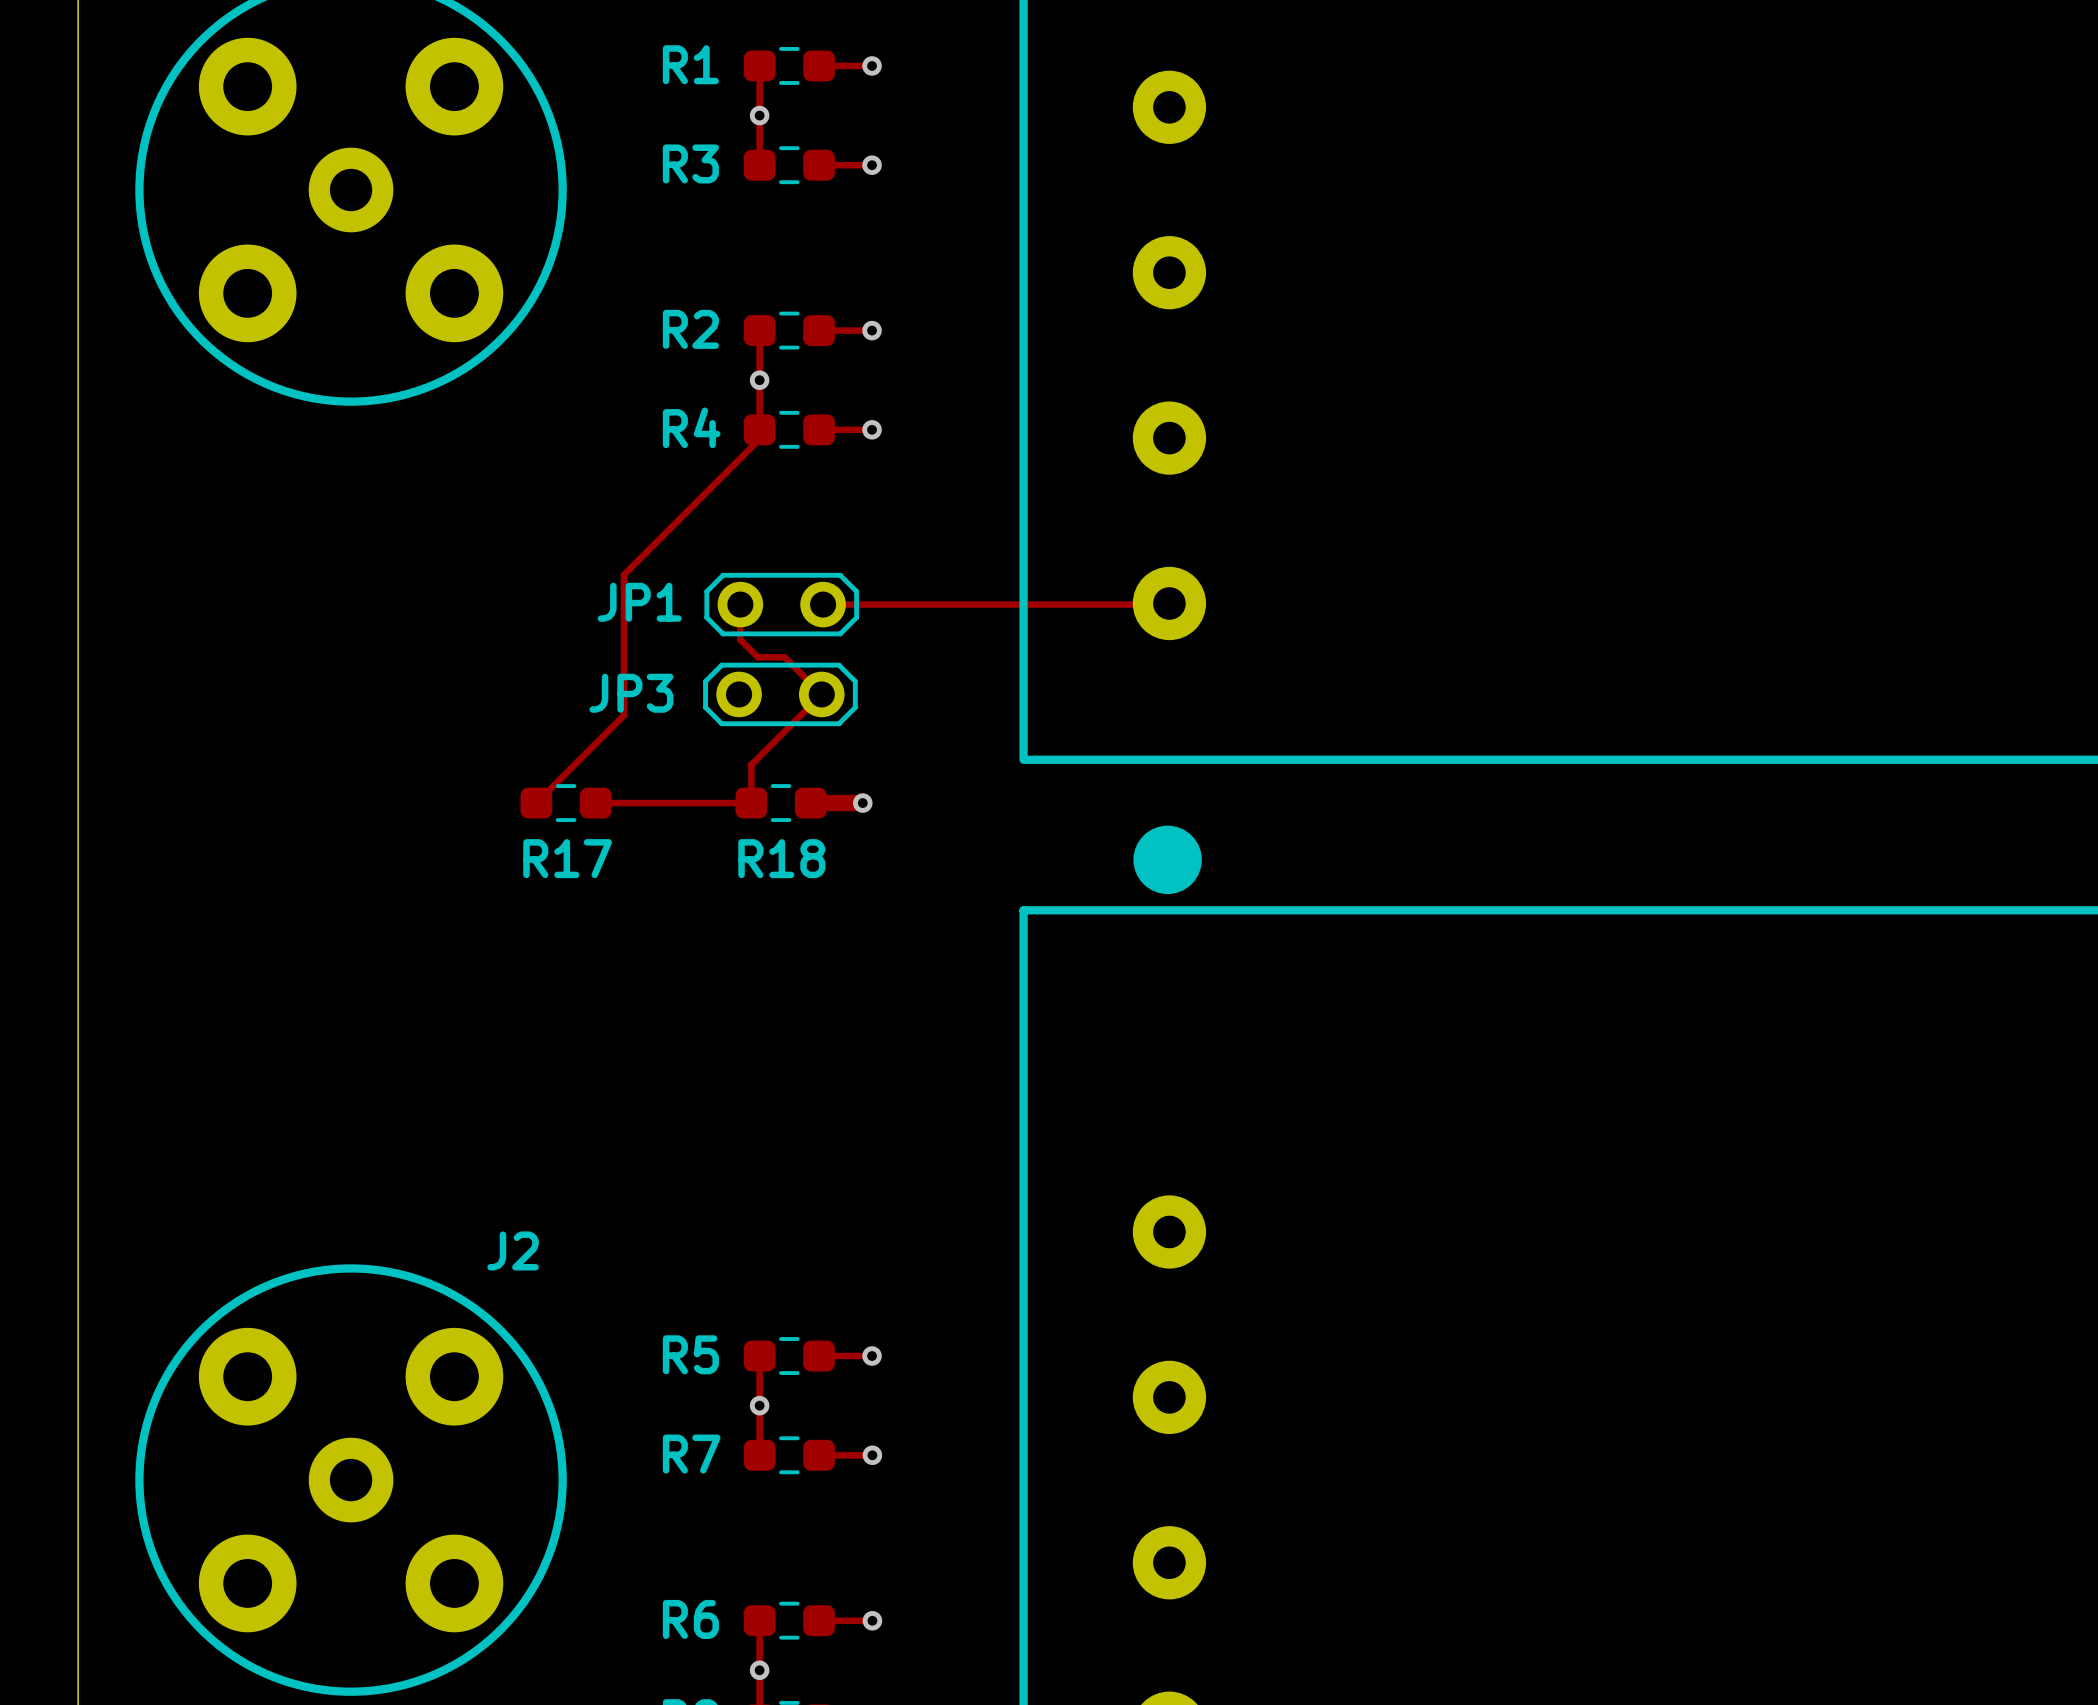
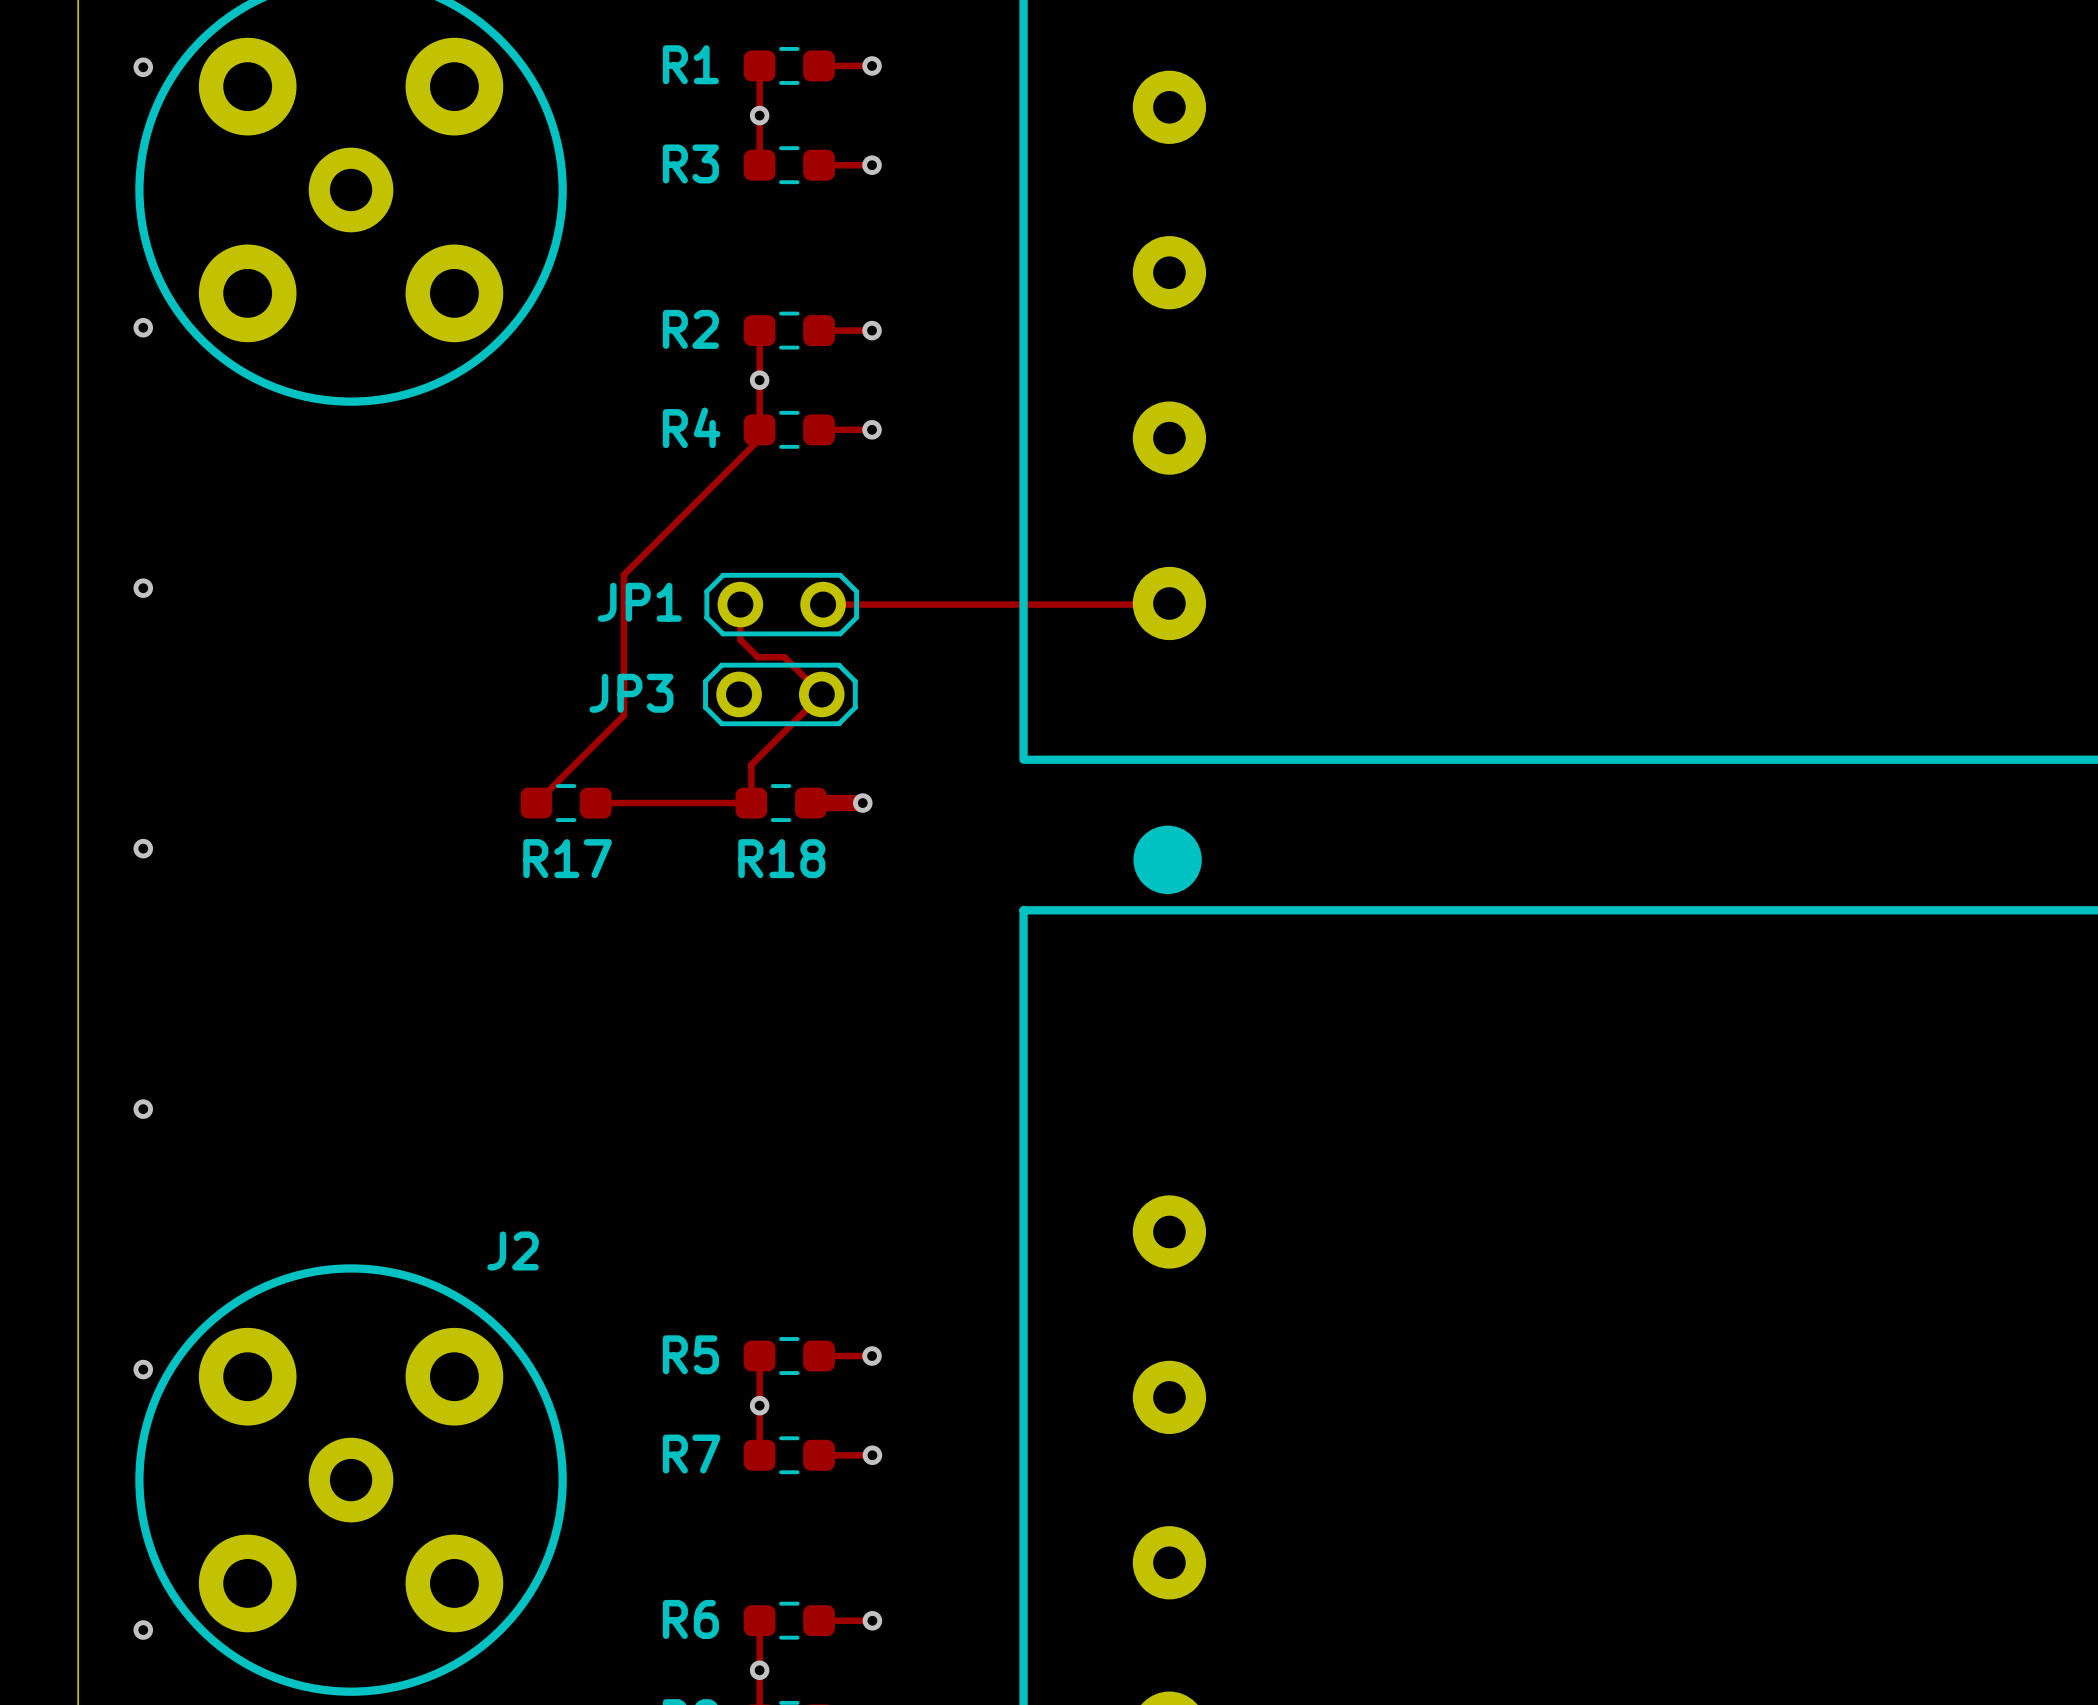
via: none -> (143, 67)
via: none -> (143, 327)
via: none -> (143, 588)
via: none -> (143, 848)
via: none -> (143, 1109)
via: none -> (143, 1369)
via: none -> (143, 1630)

